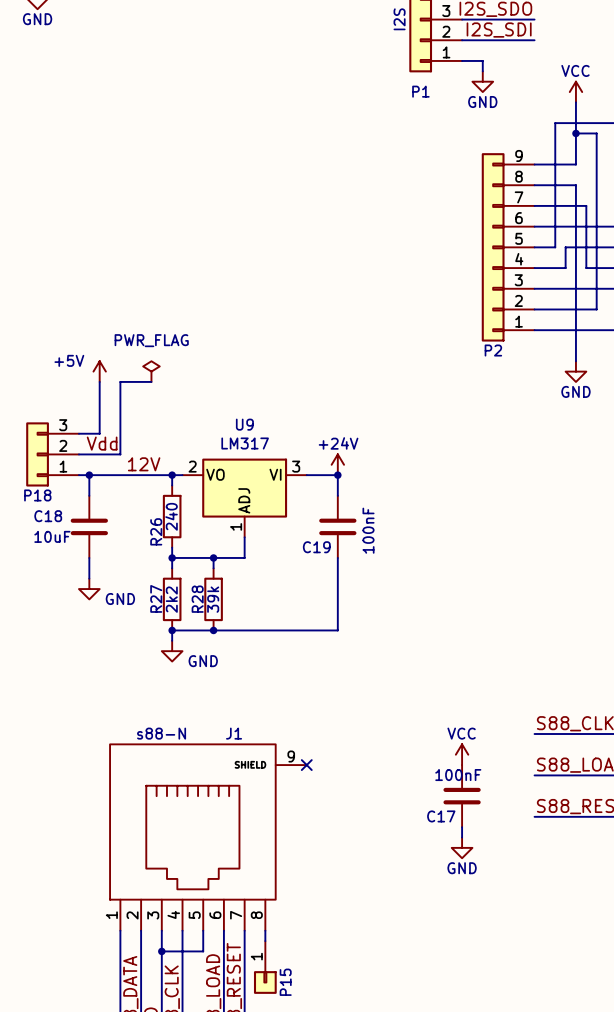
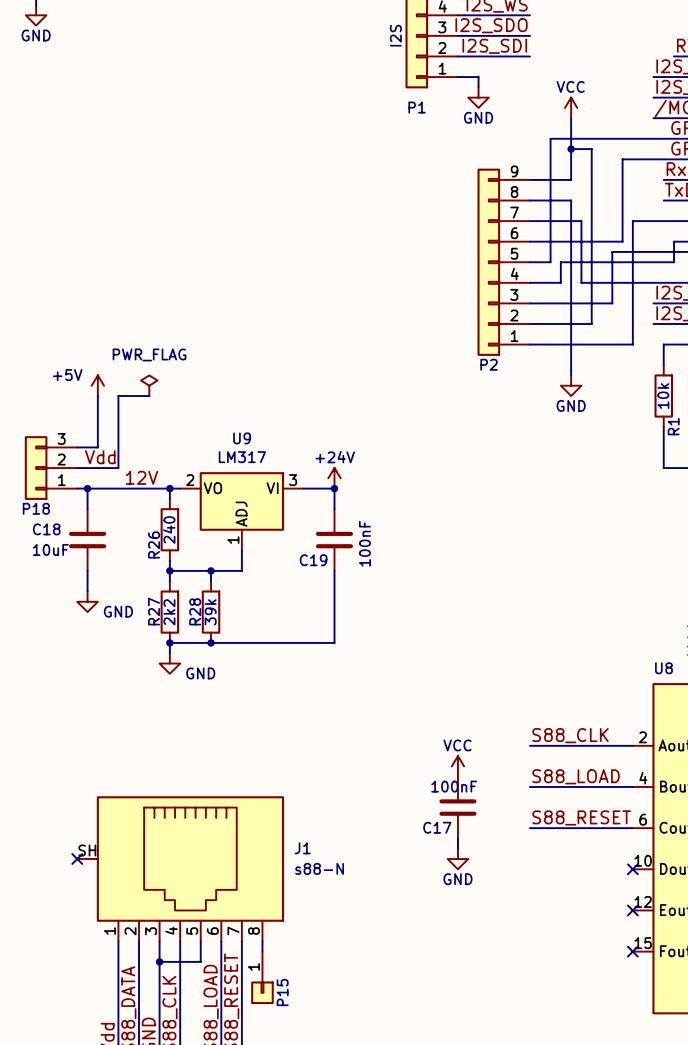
J1 value position: s88-N (161, 733) -> s88-N (319, 868)
J1 name position: J1 (234, 733) -> J1 (302, 848)
J1 symbol: [110, 744, 307, 931] -> [77, 796, 285, 942]
no-connect mark: (306, 765) -> none
no-connect mark: none -> (77, 859)

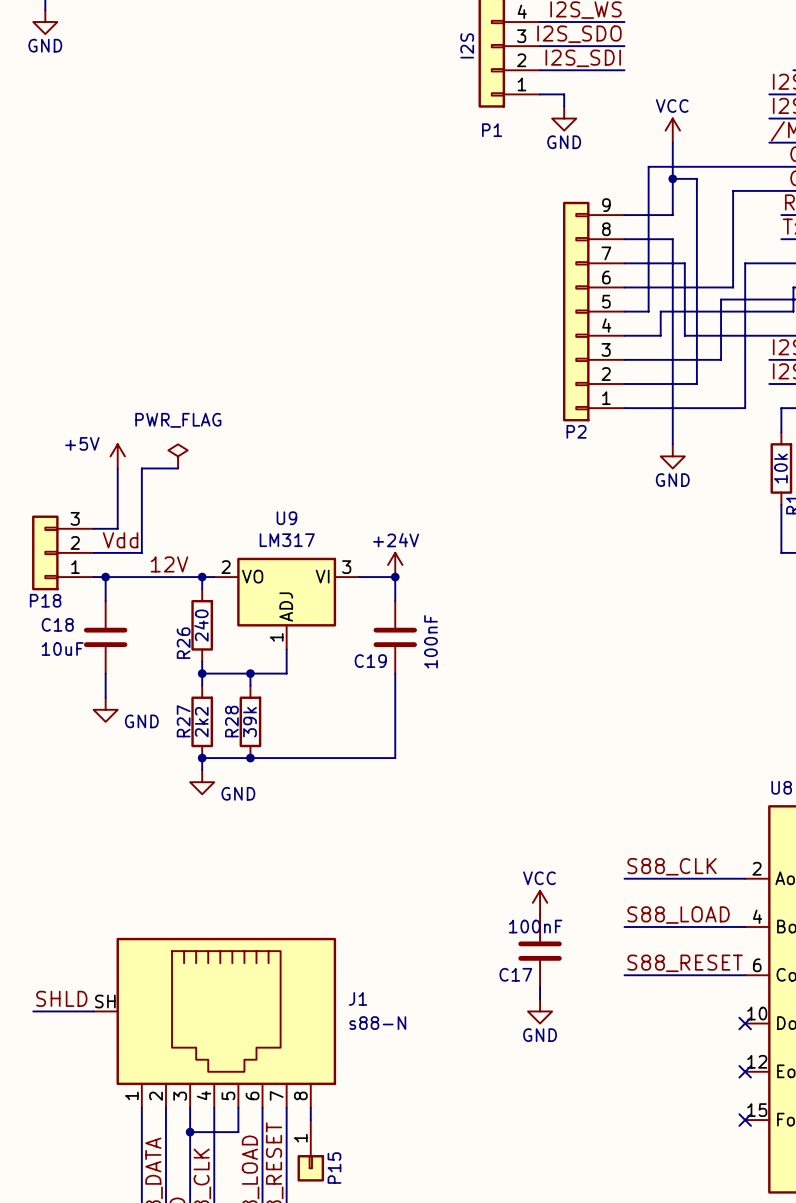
label: none -> SHLD (61, 998)
wire: none -> (33, 1011) (93, 1011)
no-connect mark: (77, 859) -> none

